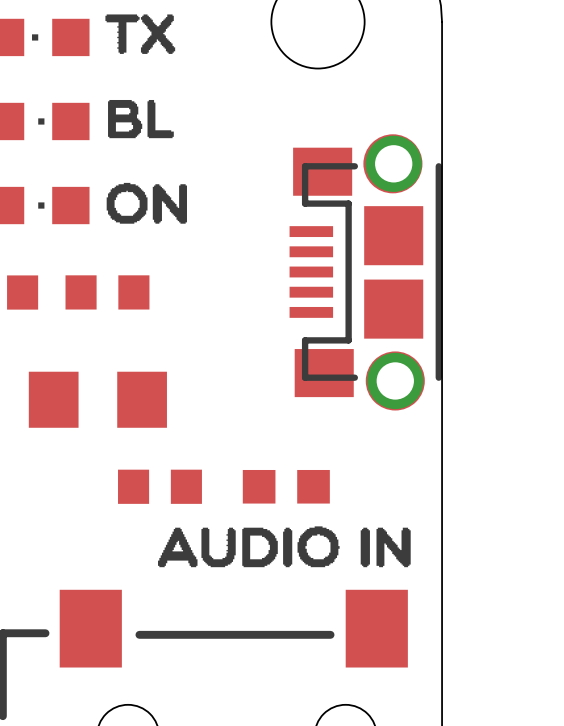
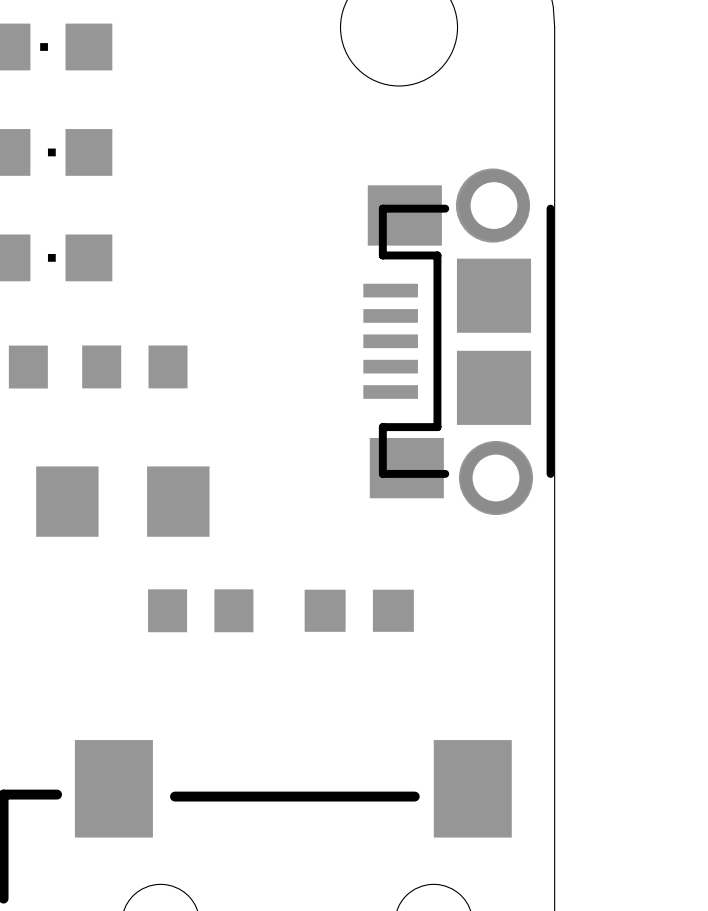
drawing: [105, 14, 176, 54] -> none
drawing: [108, 99, 174, 139] -> none
drawing: [106, 182, 187, 224] -> none
drawing: [158, 526, 411, 568] -> none

